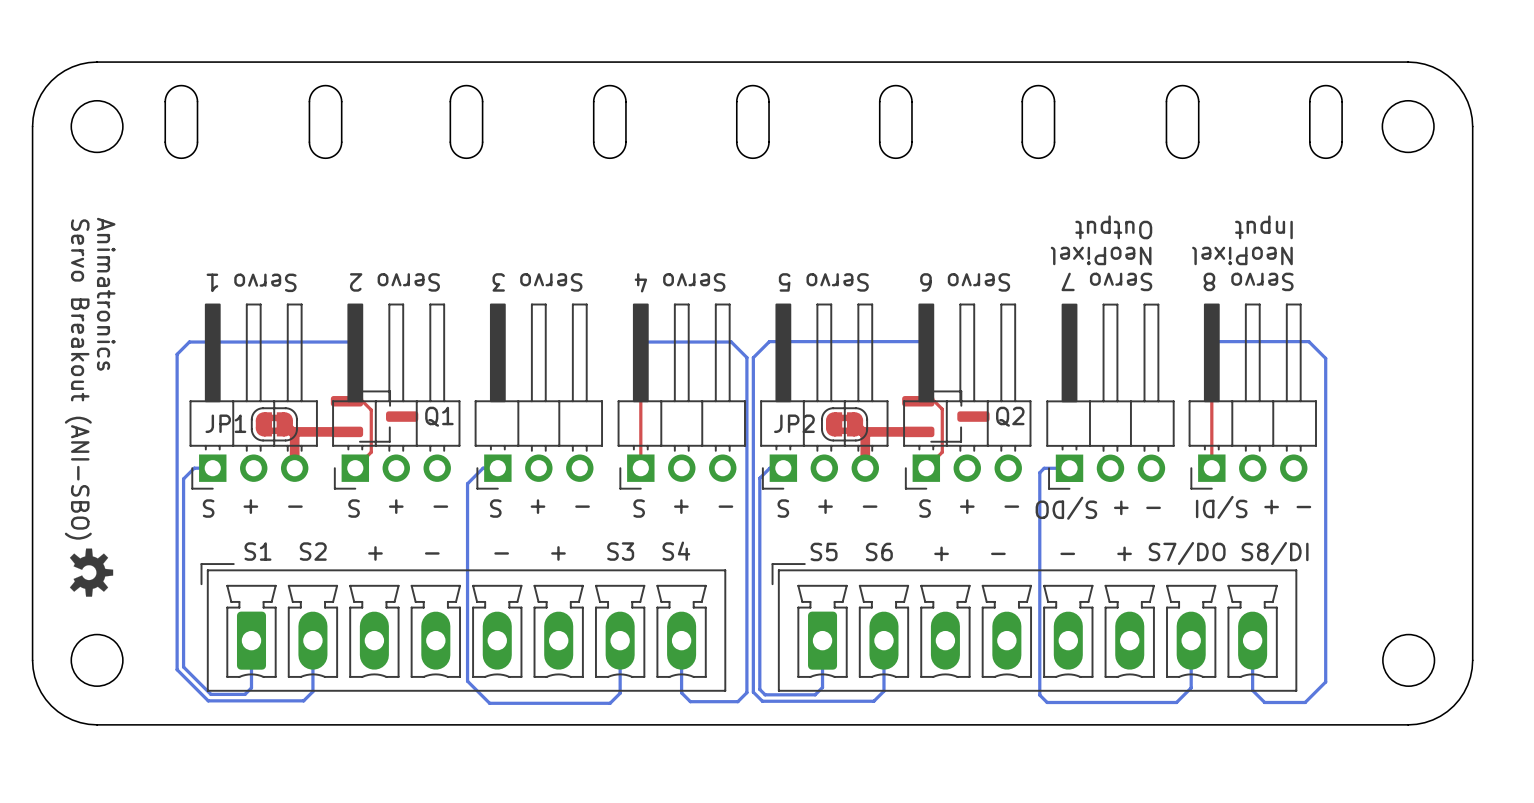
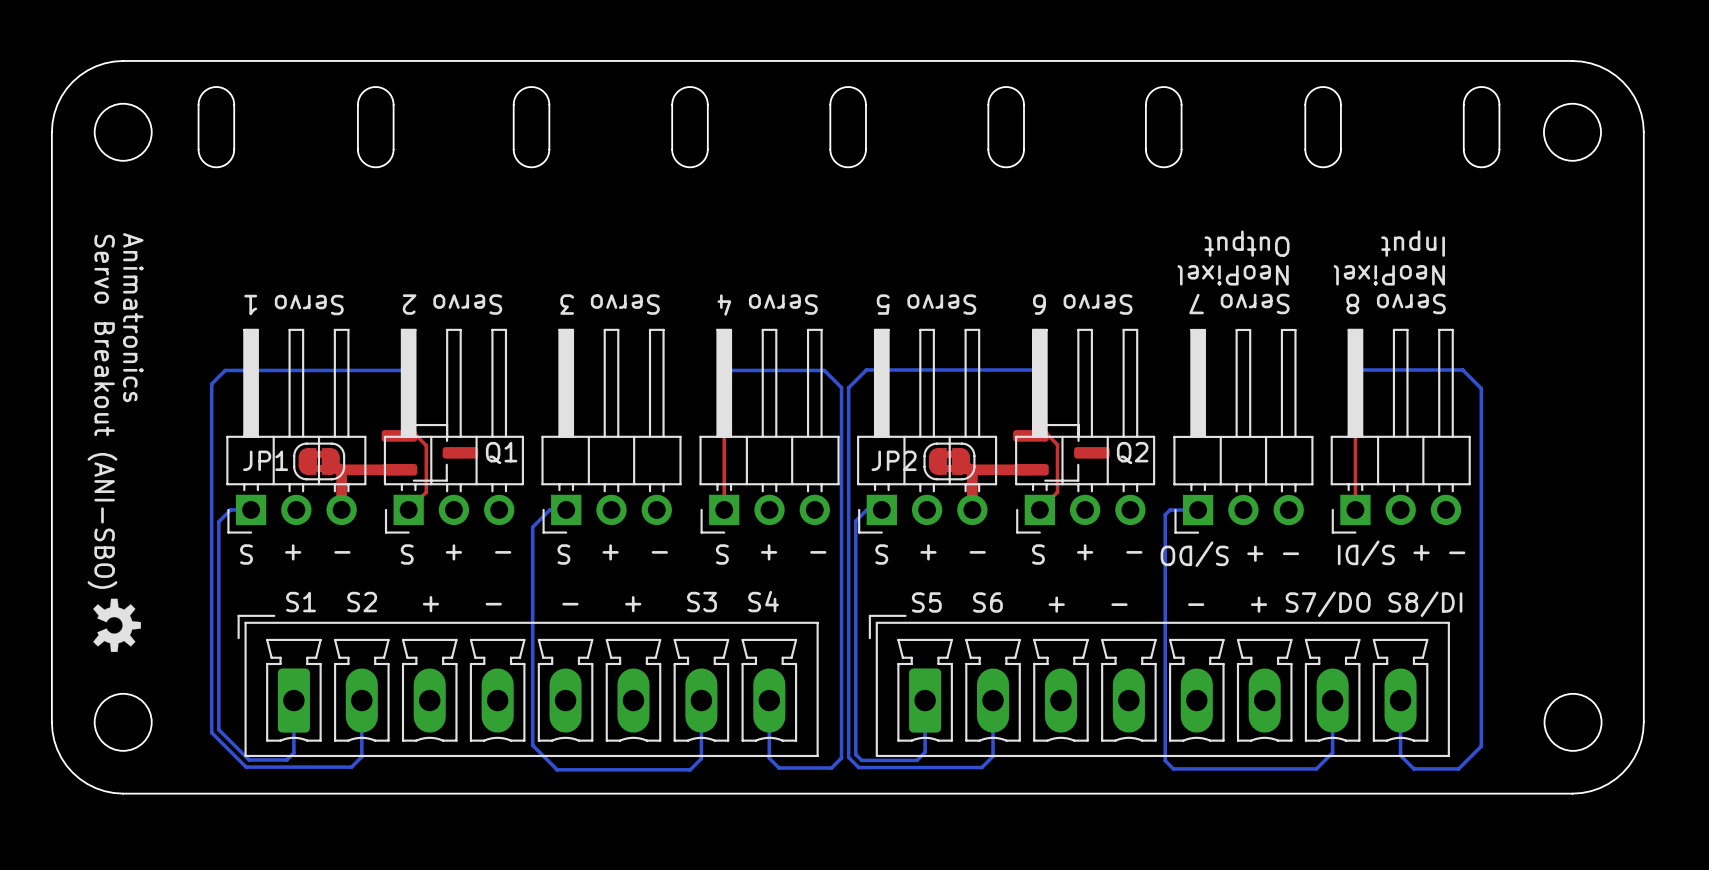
part footprint: [189, 303, 318, 490] -> [226, 328, 367, 534]
part footprint: [332, 303, 461, 490] -> [383, 328, 524, 534]
part footprint: [474, 303, 604, 490] -> [541, 328, 682, 534]
part footprint: [617, 303, 746, 490] -> [699, 328, 840, 534]
part footprint: [760, 303, 889, 490] -> [857, 328, 998, 534]
part footprint: [903, 303, 1032, 490] -> [1015, 328, 1156, 534]
part footprint: [1046, 303, 1175, 490] -> [1173, 328, 1314, 534]
part footprint: [1188, 303, 1317, 490] -> [1330, 328, 1471, 534]

